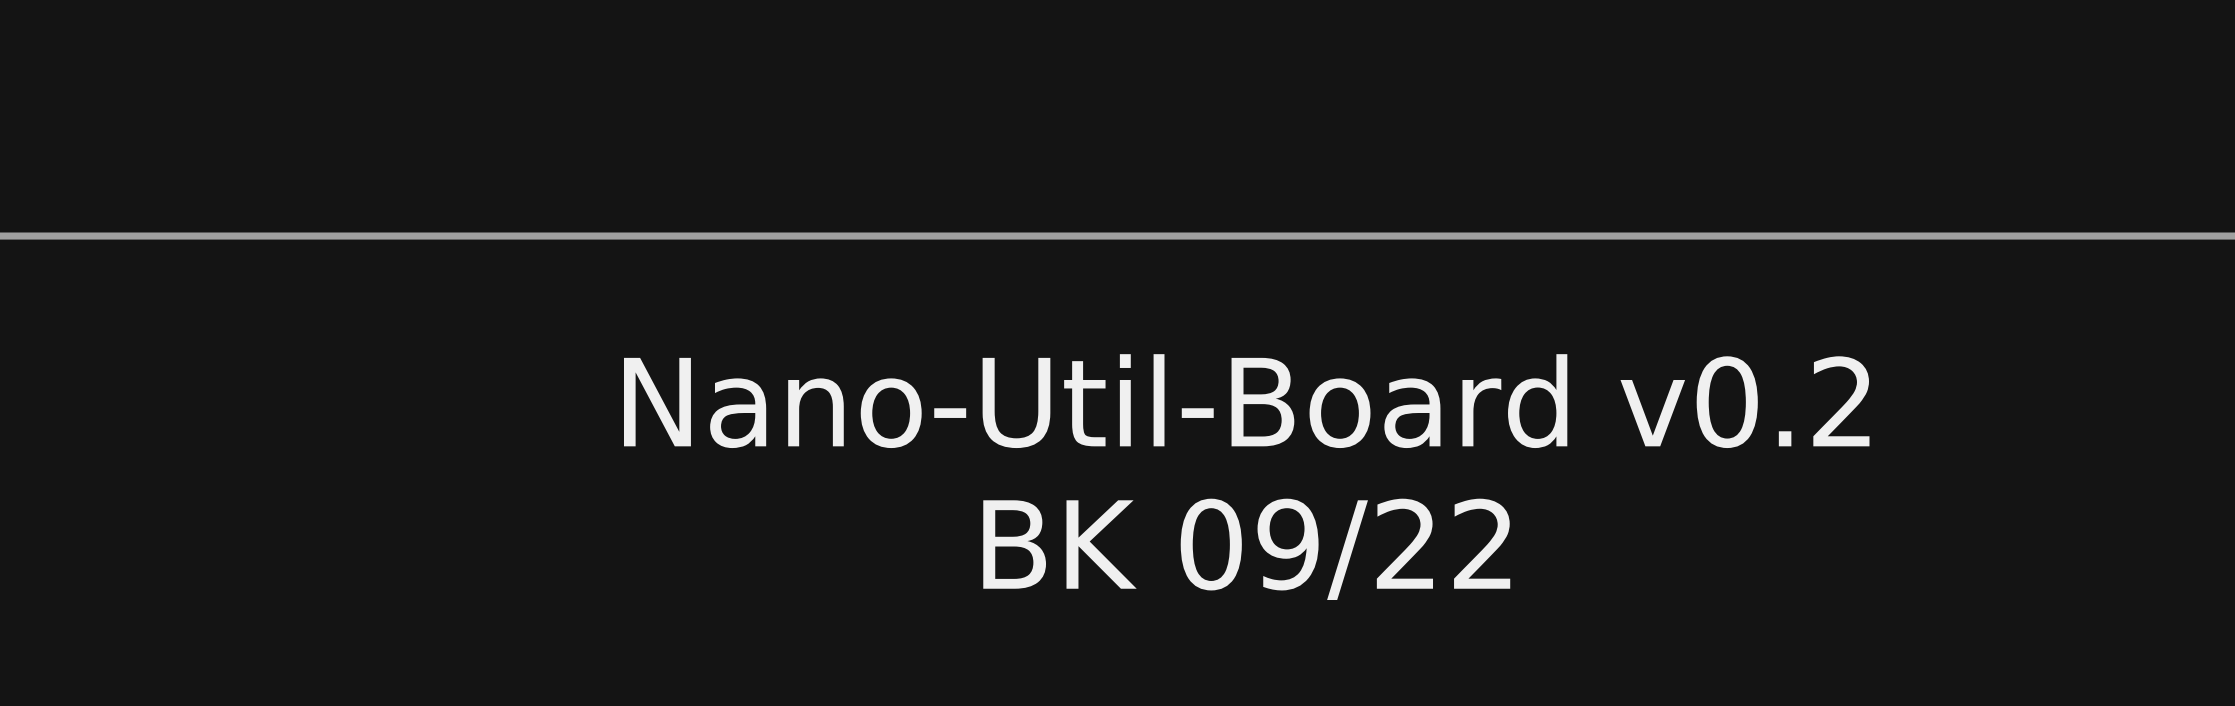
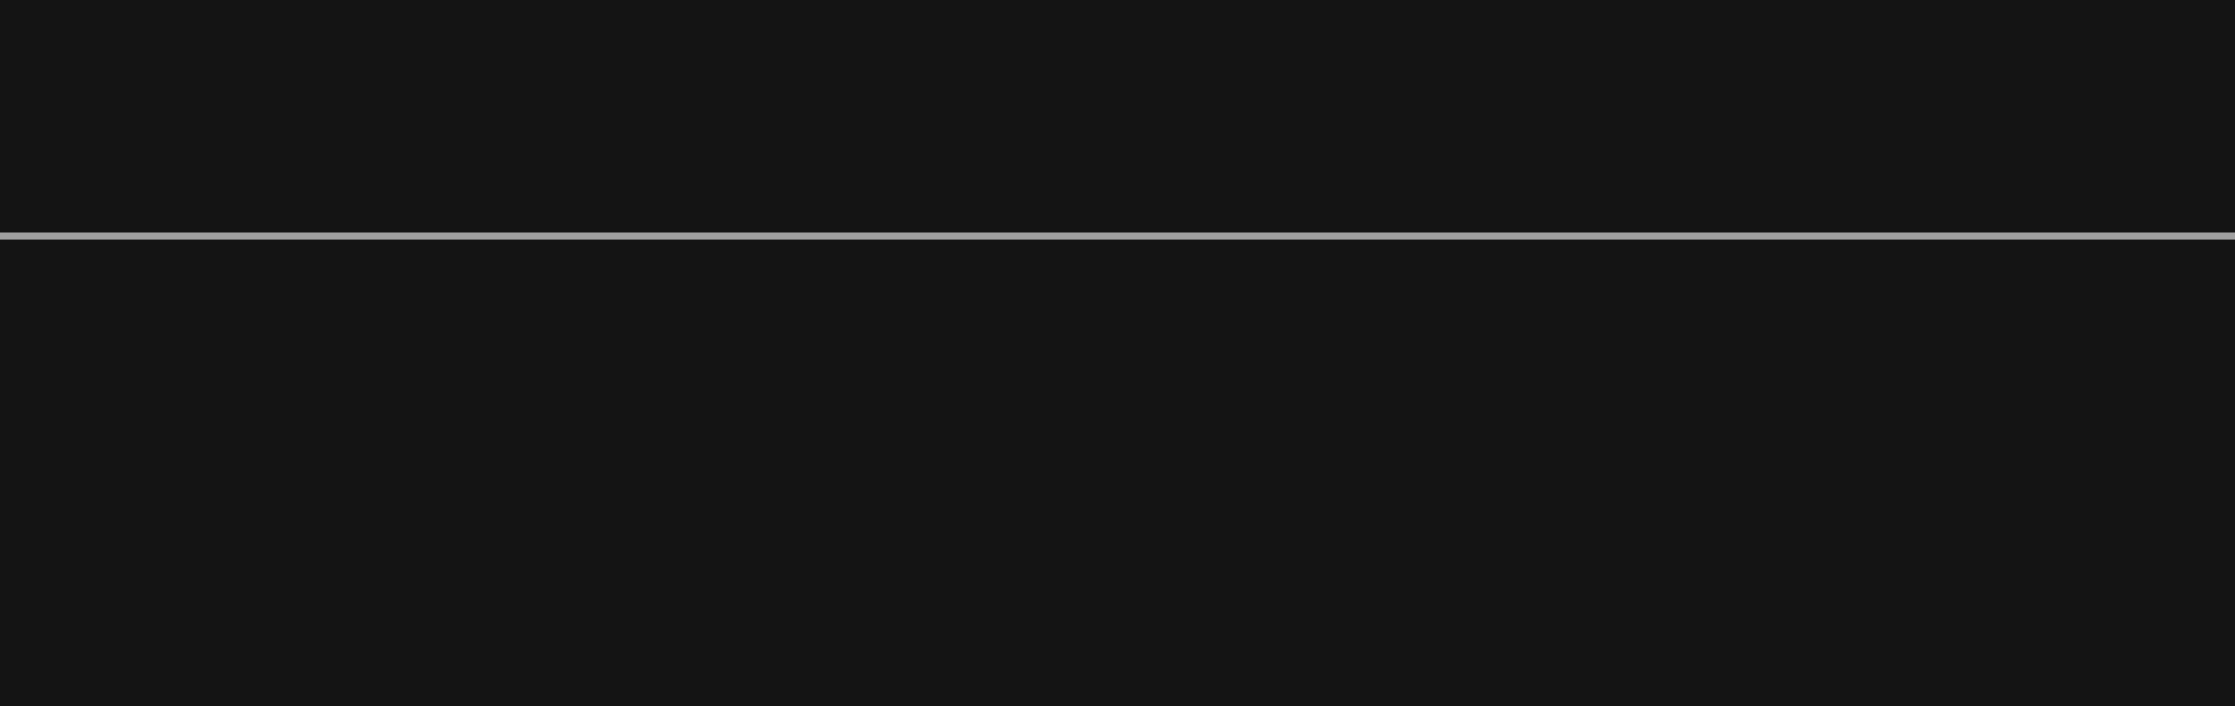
text: Nano-Util-Board v0.2 (1246, 401) -> none
text: BK 09/22 (1246, 549) -> none

